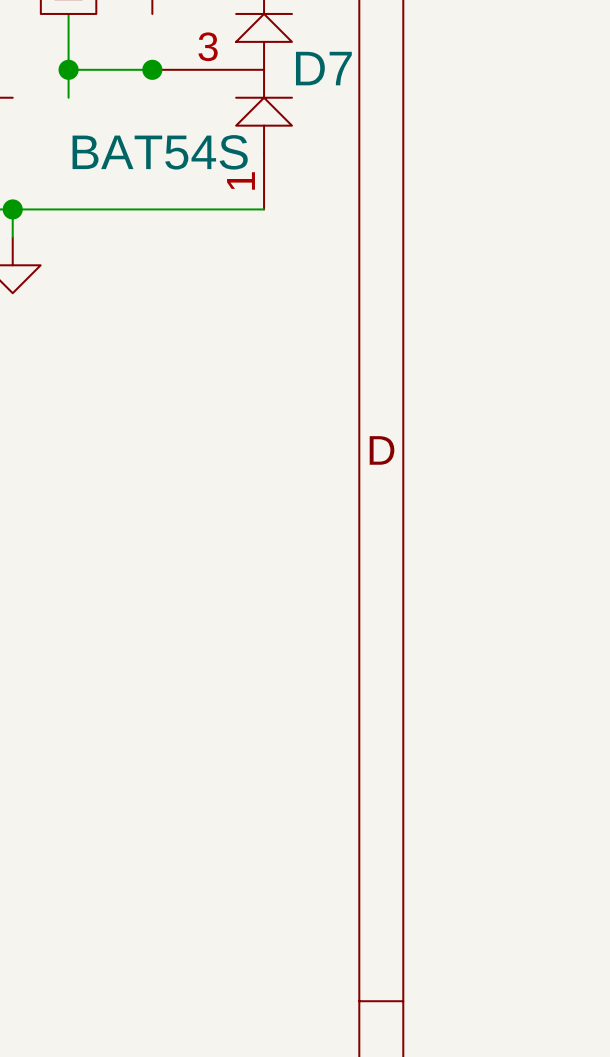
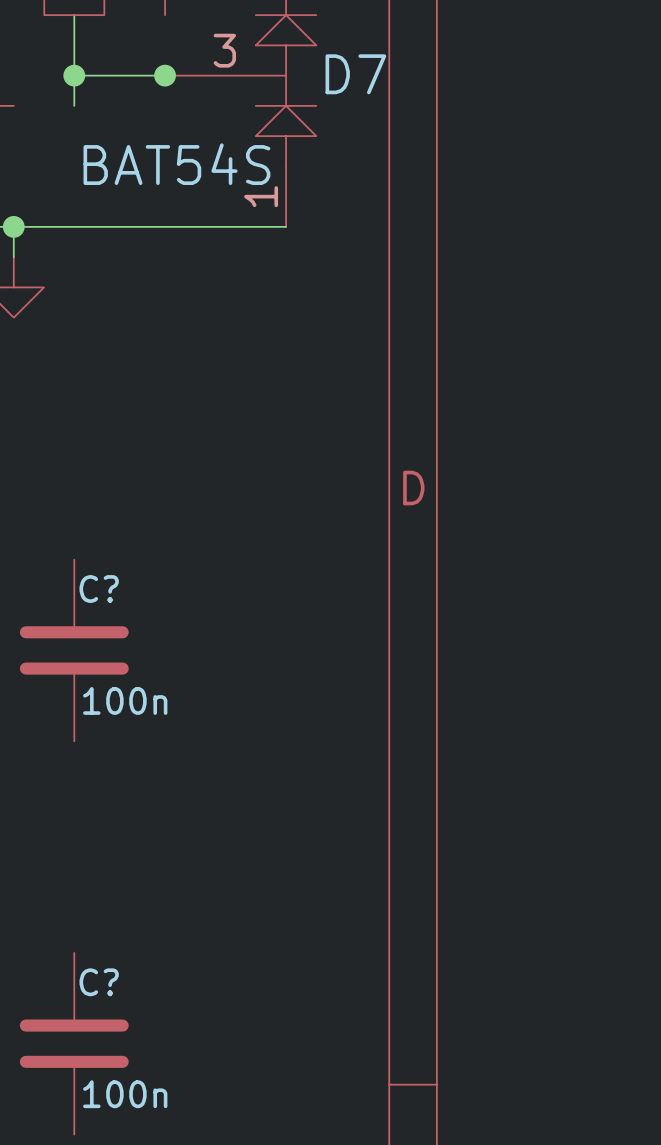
C?: none -> 100n (74, 650)
C?: none -> 100n (74, 1043)

